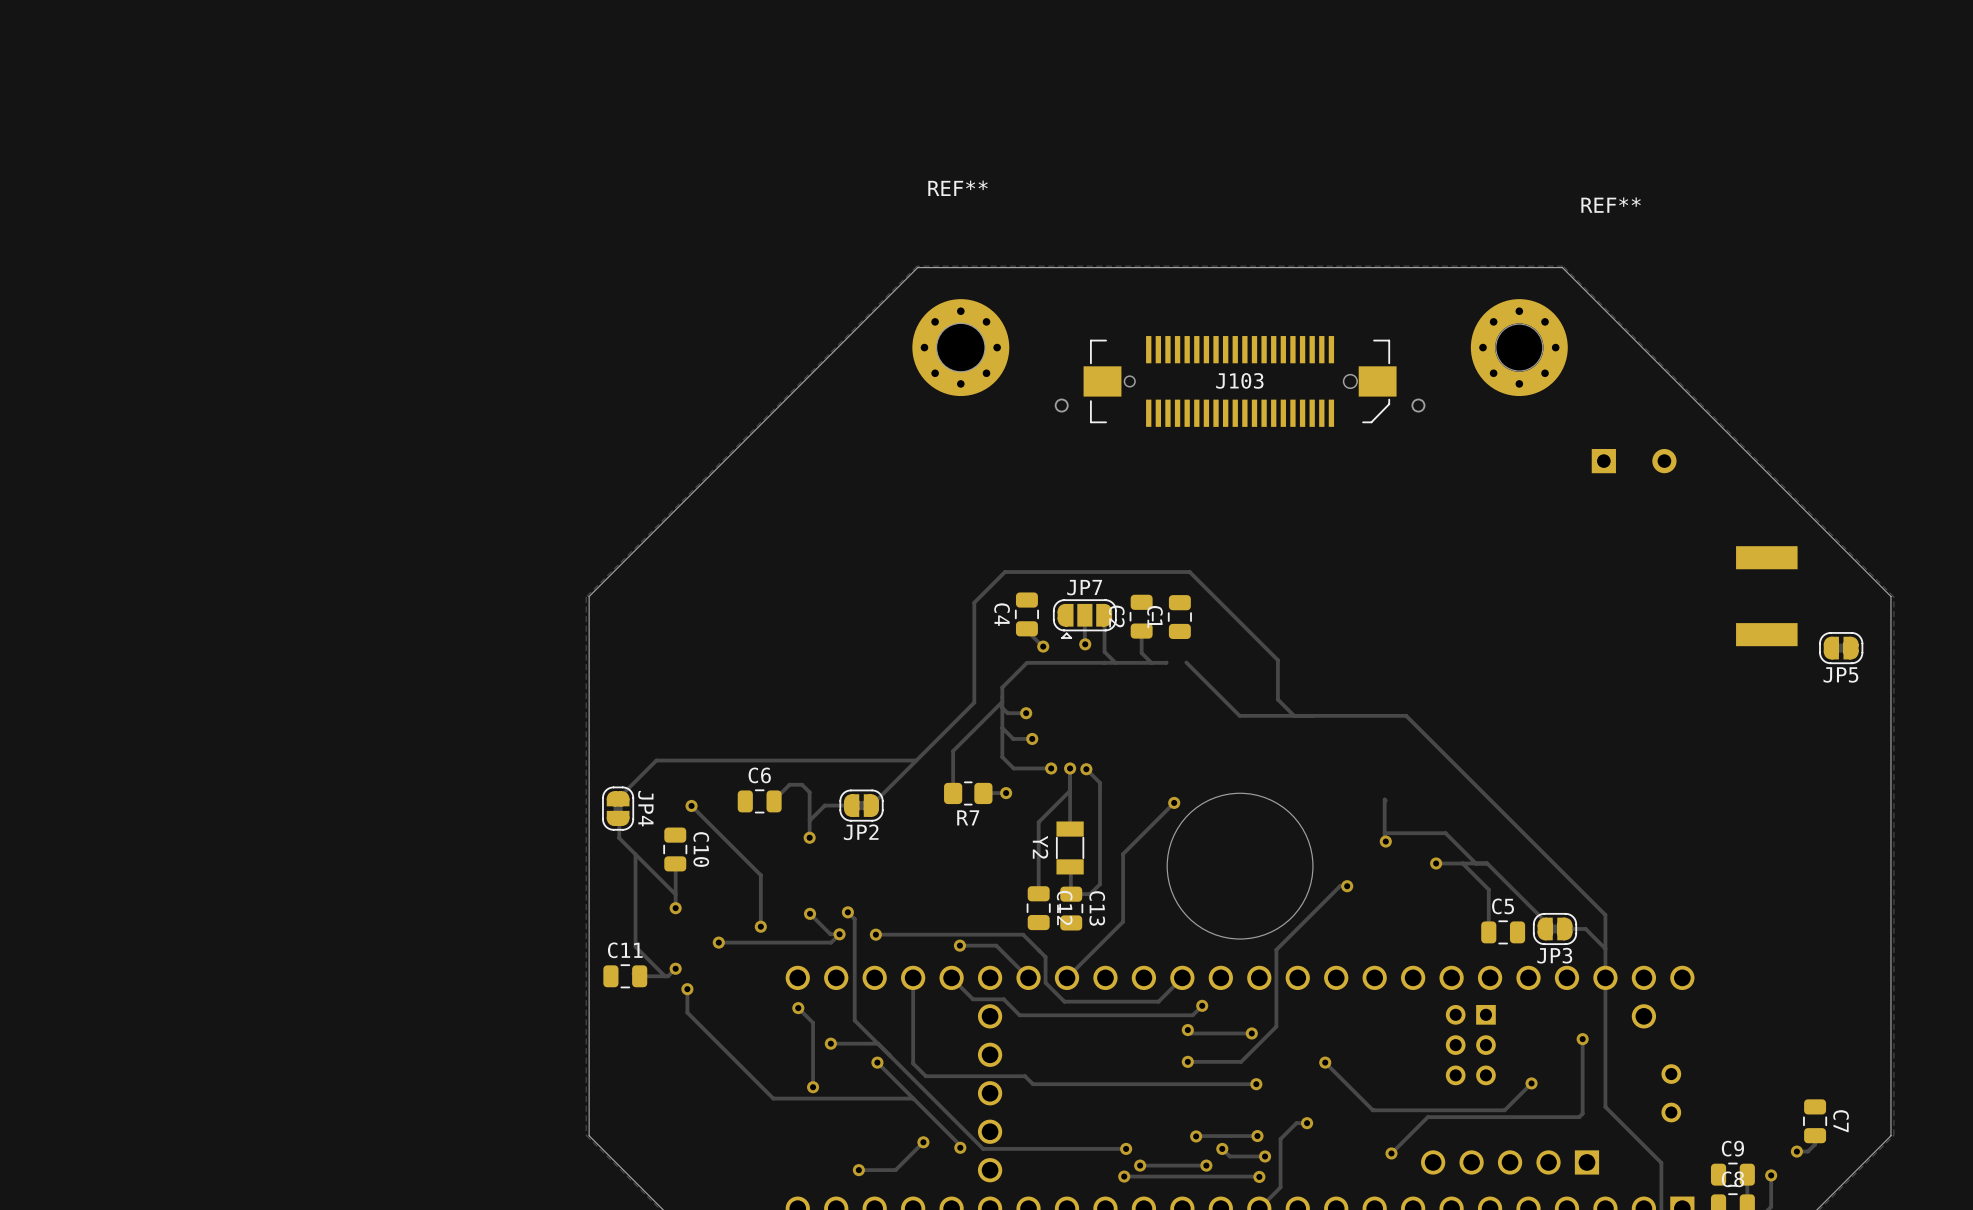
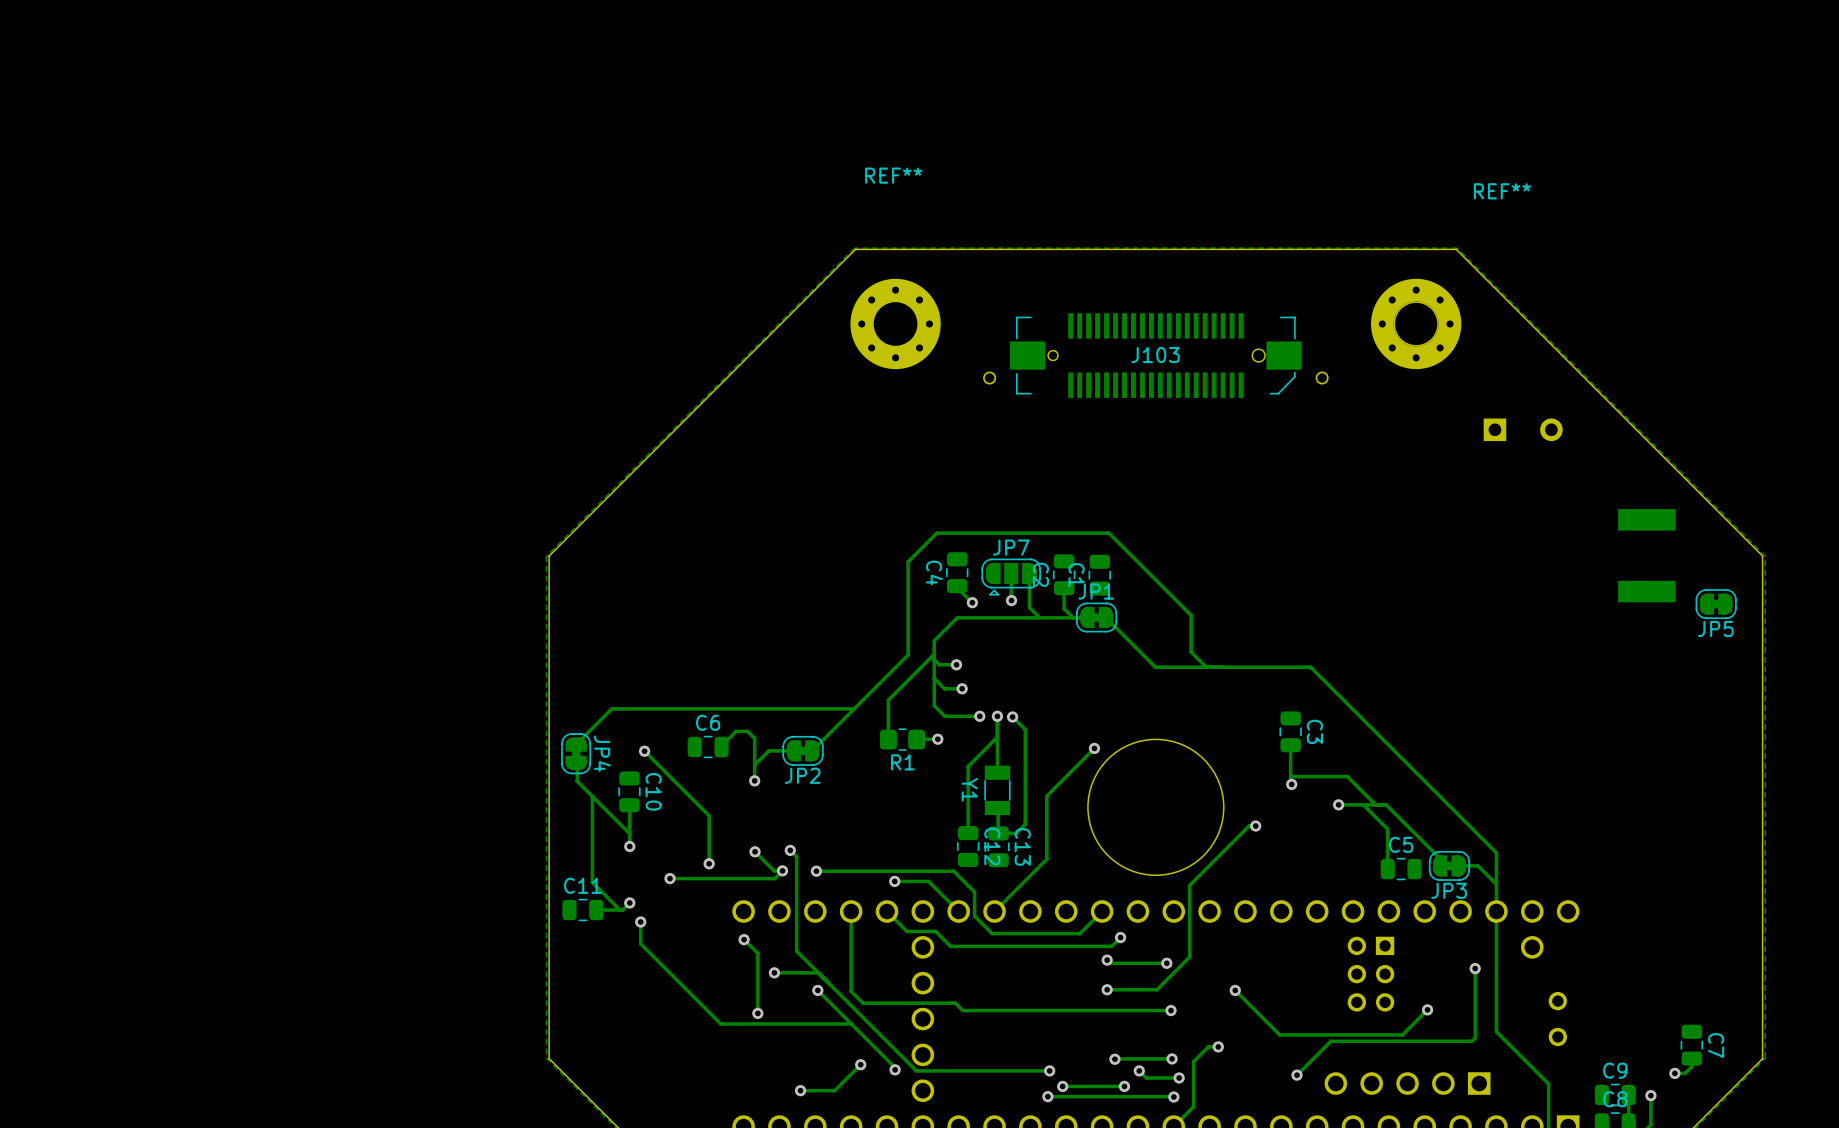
JP1: none -> (1096, 617)
C3: none -> (1290, 731)
R7 name: R7 (968, 817) -> R1 (902, 762)
Y2 name: Y2 (1040, 847) -> Y1 (969, 789)

